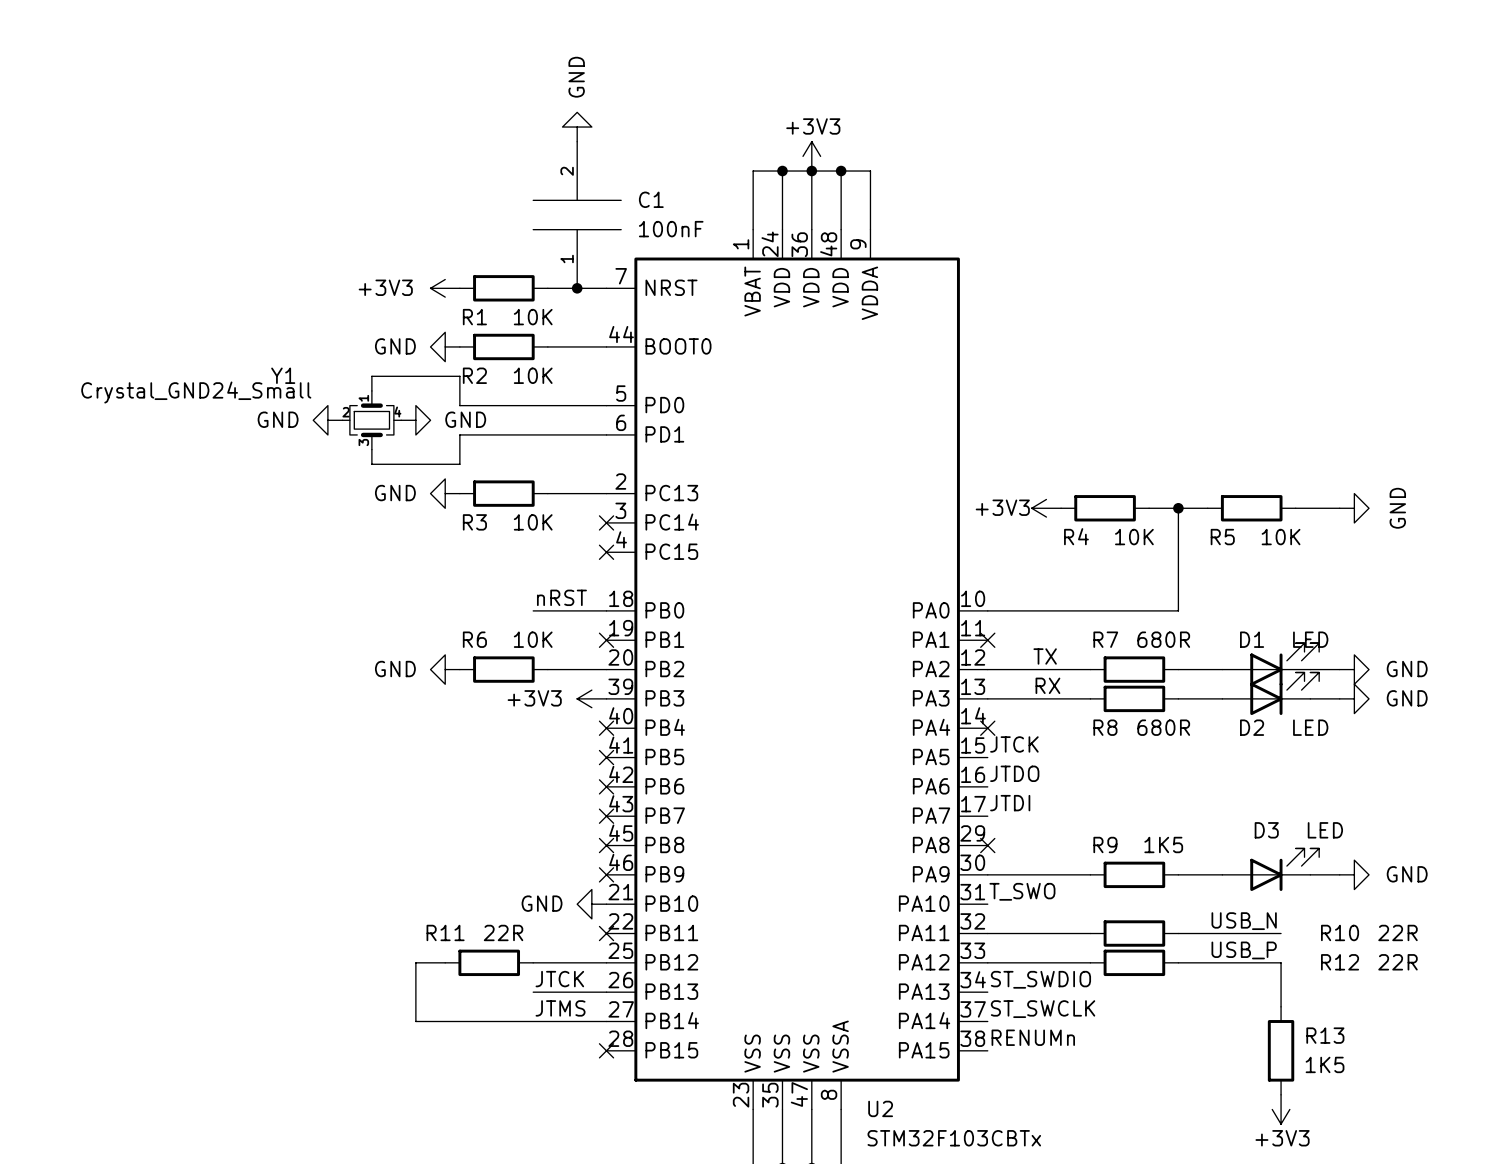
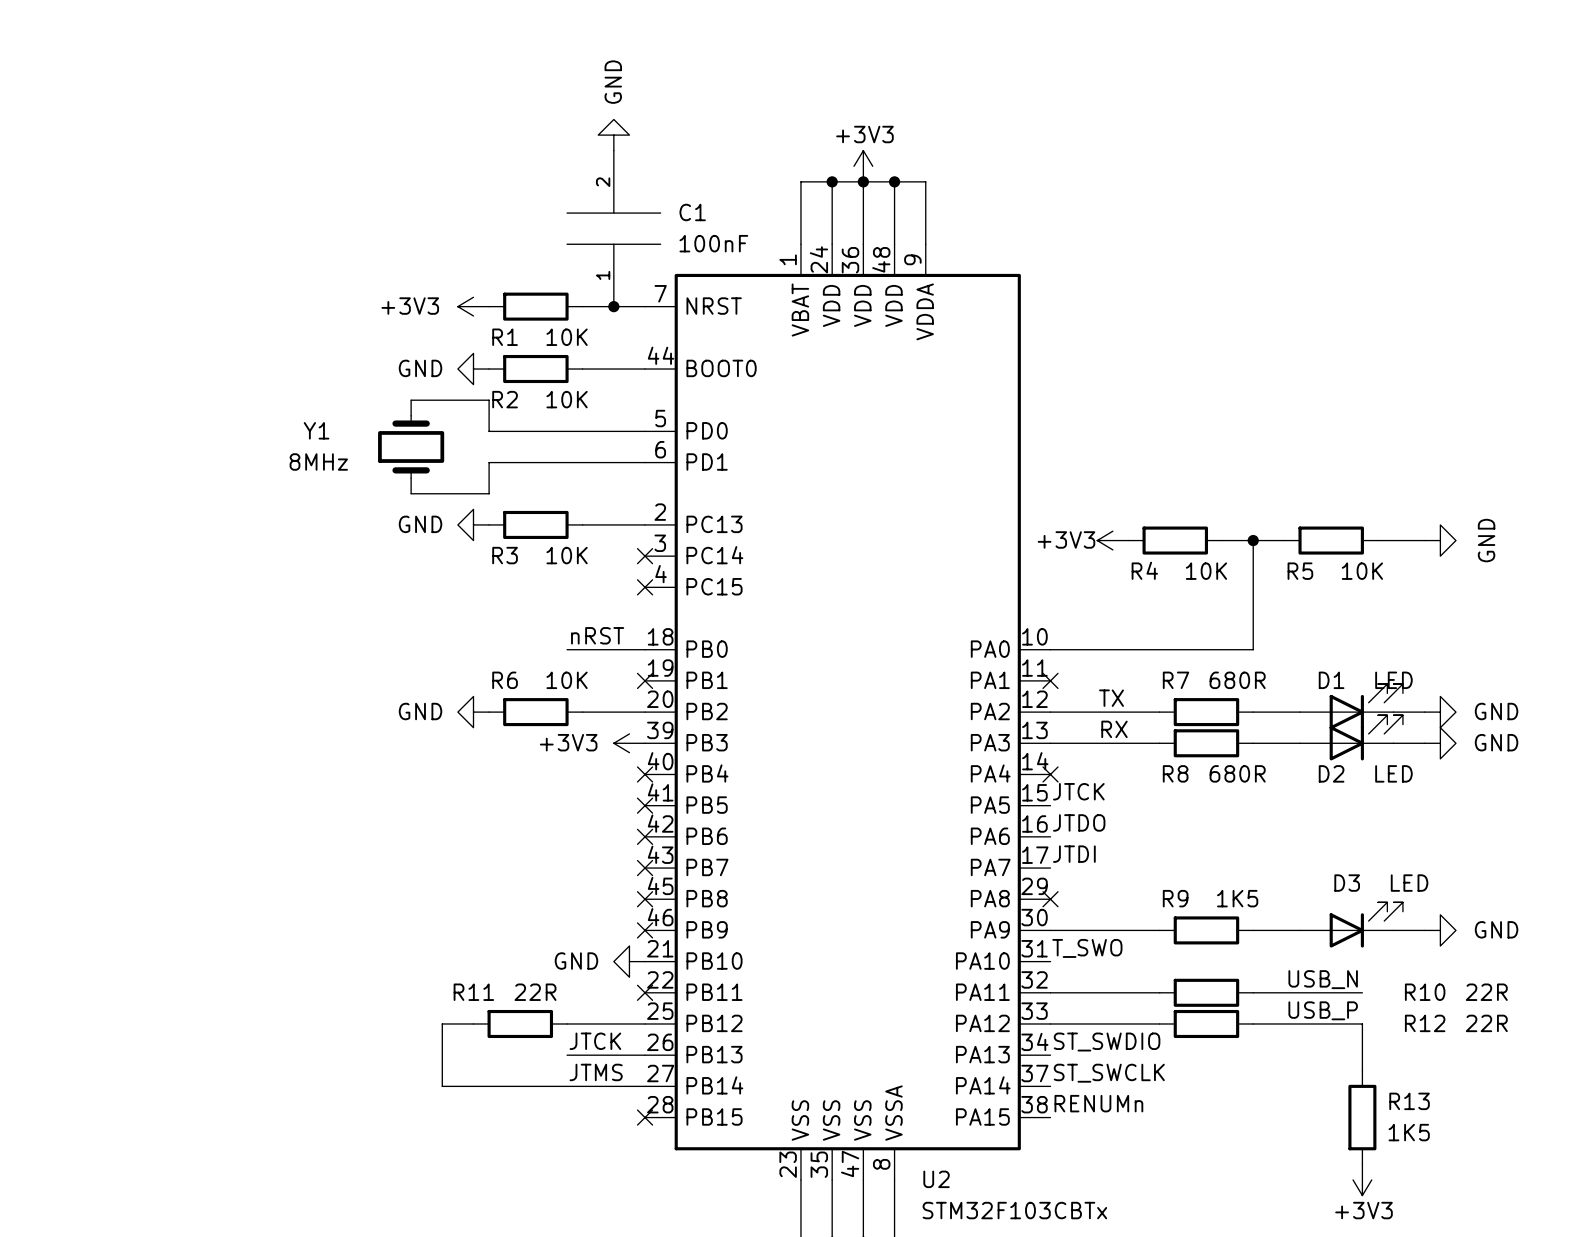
Y1 name position: Y1 (283, 375) -> Y1 (316, 430)
wire: (386, 376) (371, 376) (371, 390) -> none
Y1 symbol: [342, 390, 402, 450] -> [378, 400, 445, 494]
Y1 value: Crystal_GND24_Small (196, 392) -> 8MHz (318, 461)
power symbol: GND (327, 420) -> none
power symbol: GND (415, 420) -> none
wire: (371, 449) (371, 464) (386, 464) -> none

